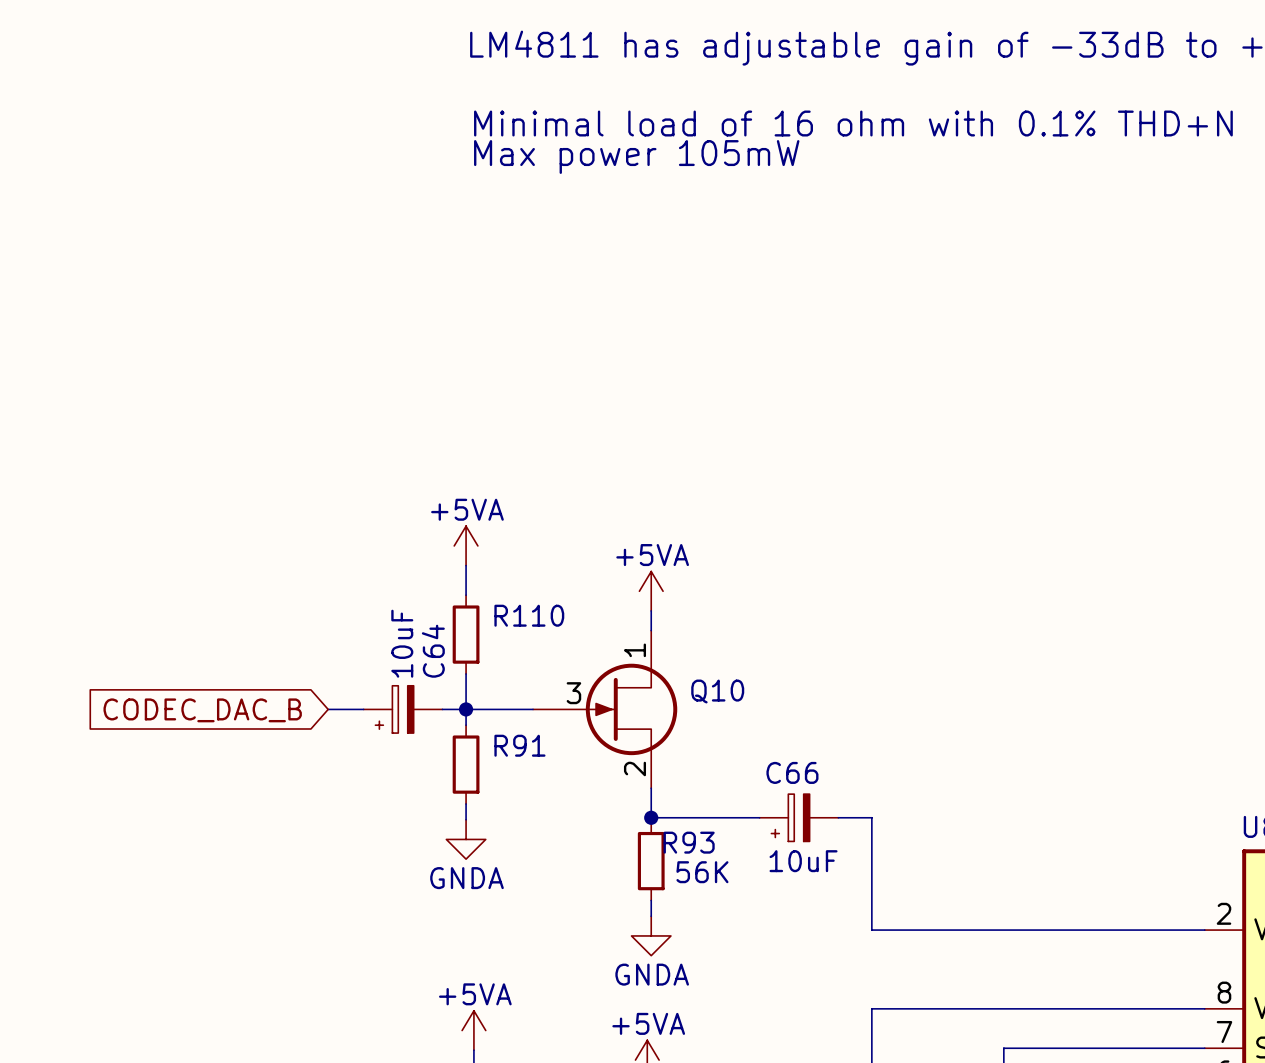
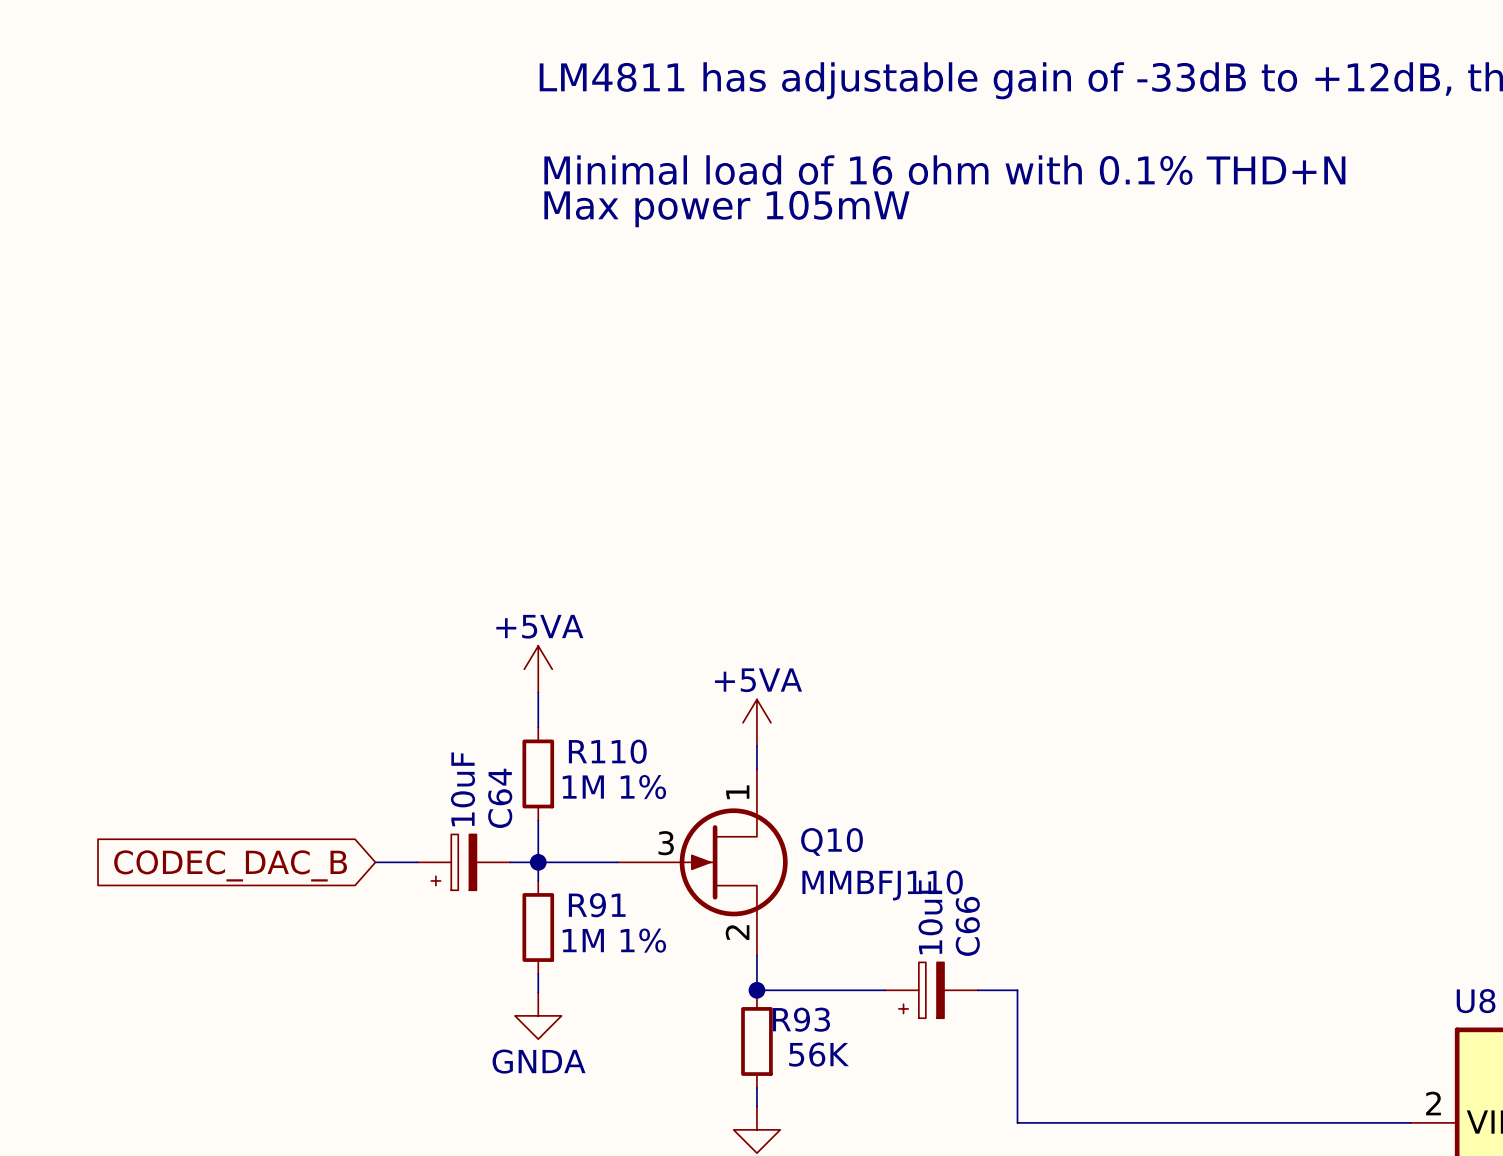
R110 value: none -> 1M 1% (614, 787)
Q10 value: none -> MMBFJ110 (882, 885)
C66 name rotation: 0° (792, 772) -> 90° counterclockwise (967, 926)
R91 value: none -> 1M 1% (614, 940)
C66 value rotation: 0° (803, 861) -> 90° counterclockwise (930, 917)
C66 value position: 10uF (803, 861) -> 10uF (930, 917)

